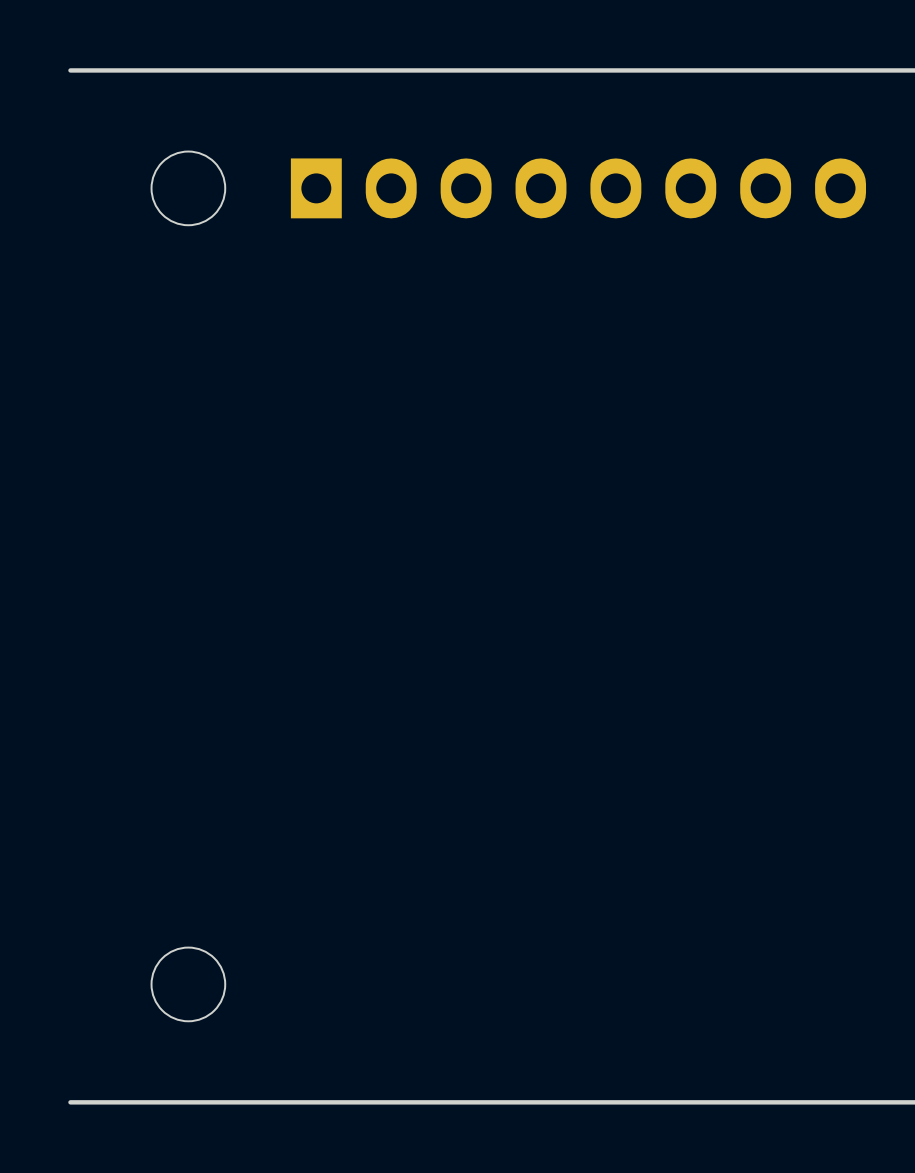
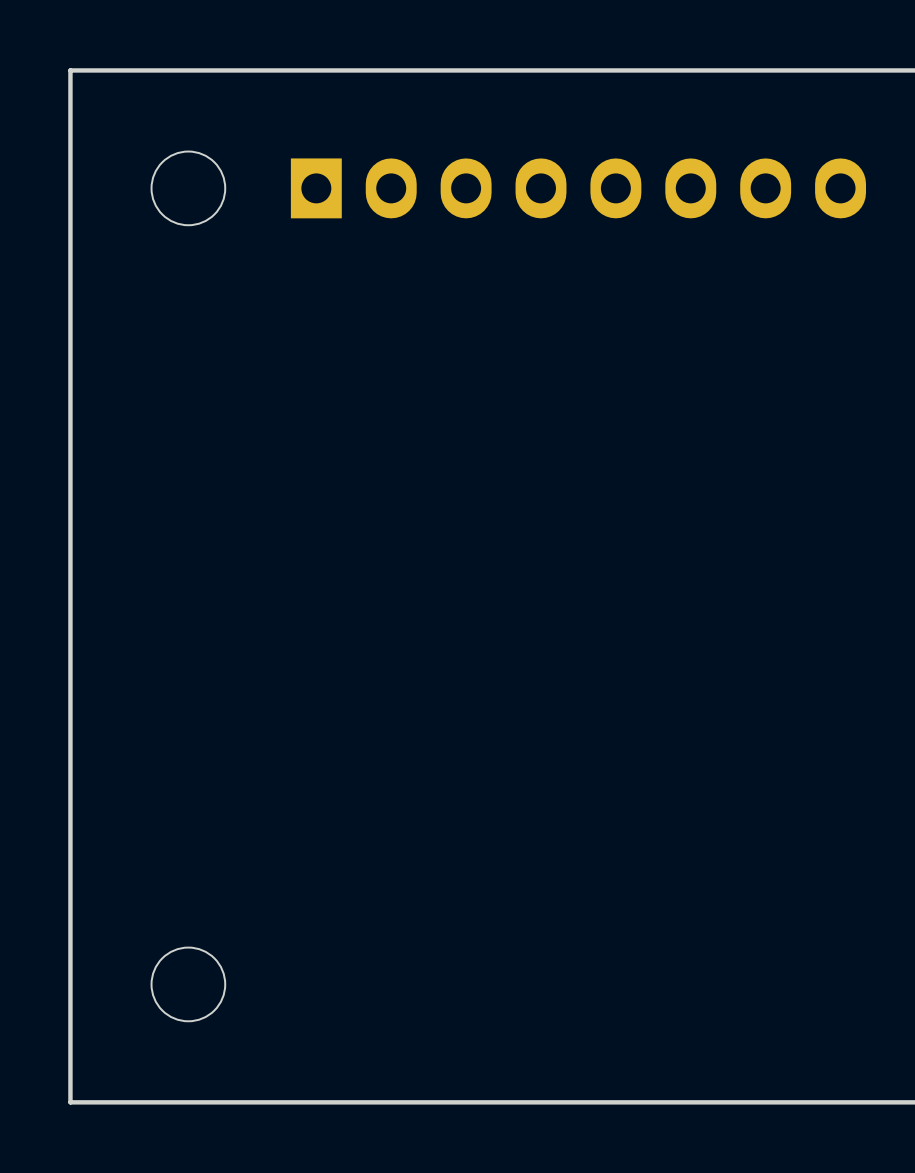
board edge: none -> (70, 70) (70, 1102)

